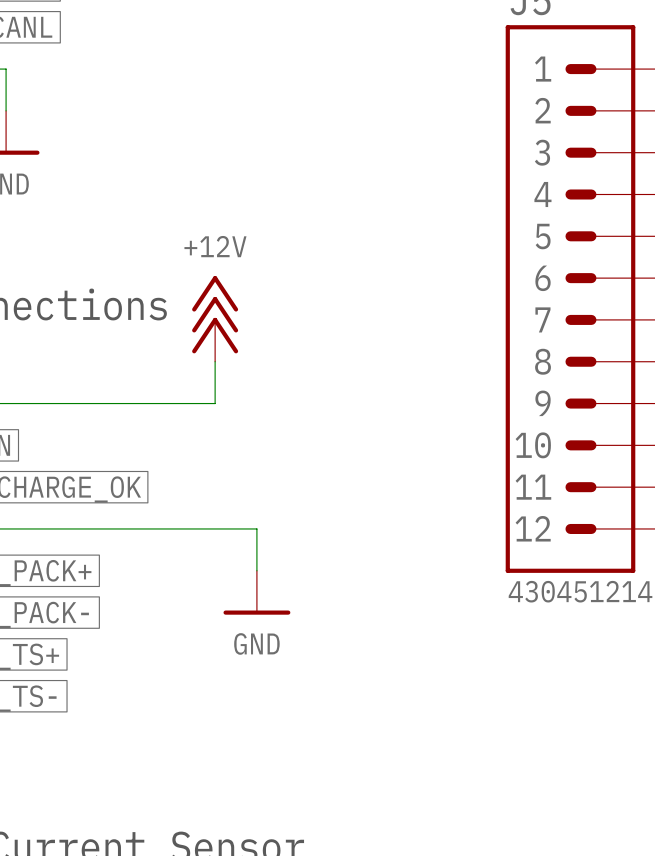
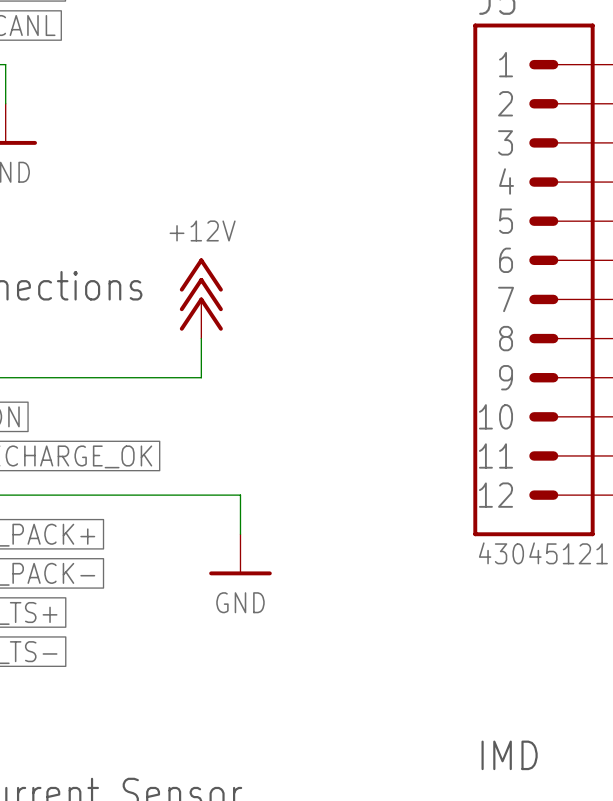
text: none -> IMD (509, 755)

